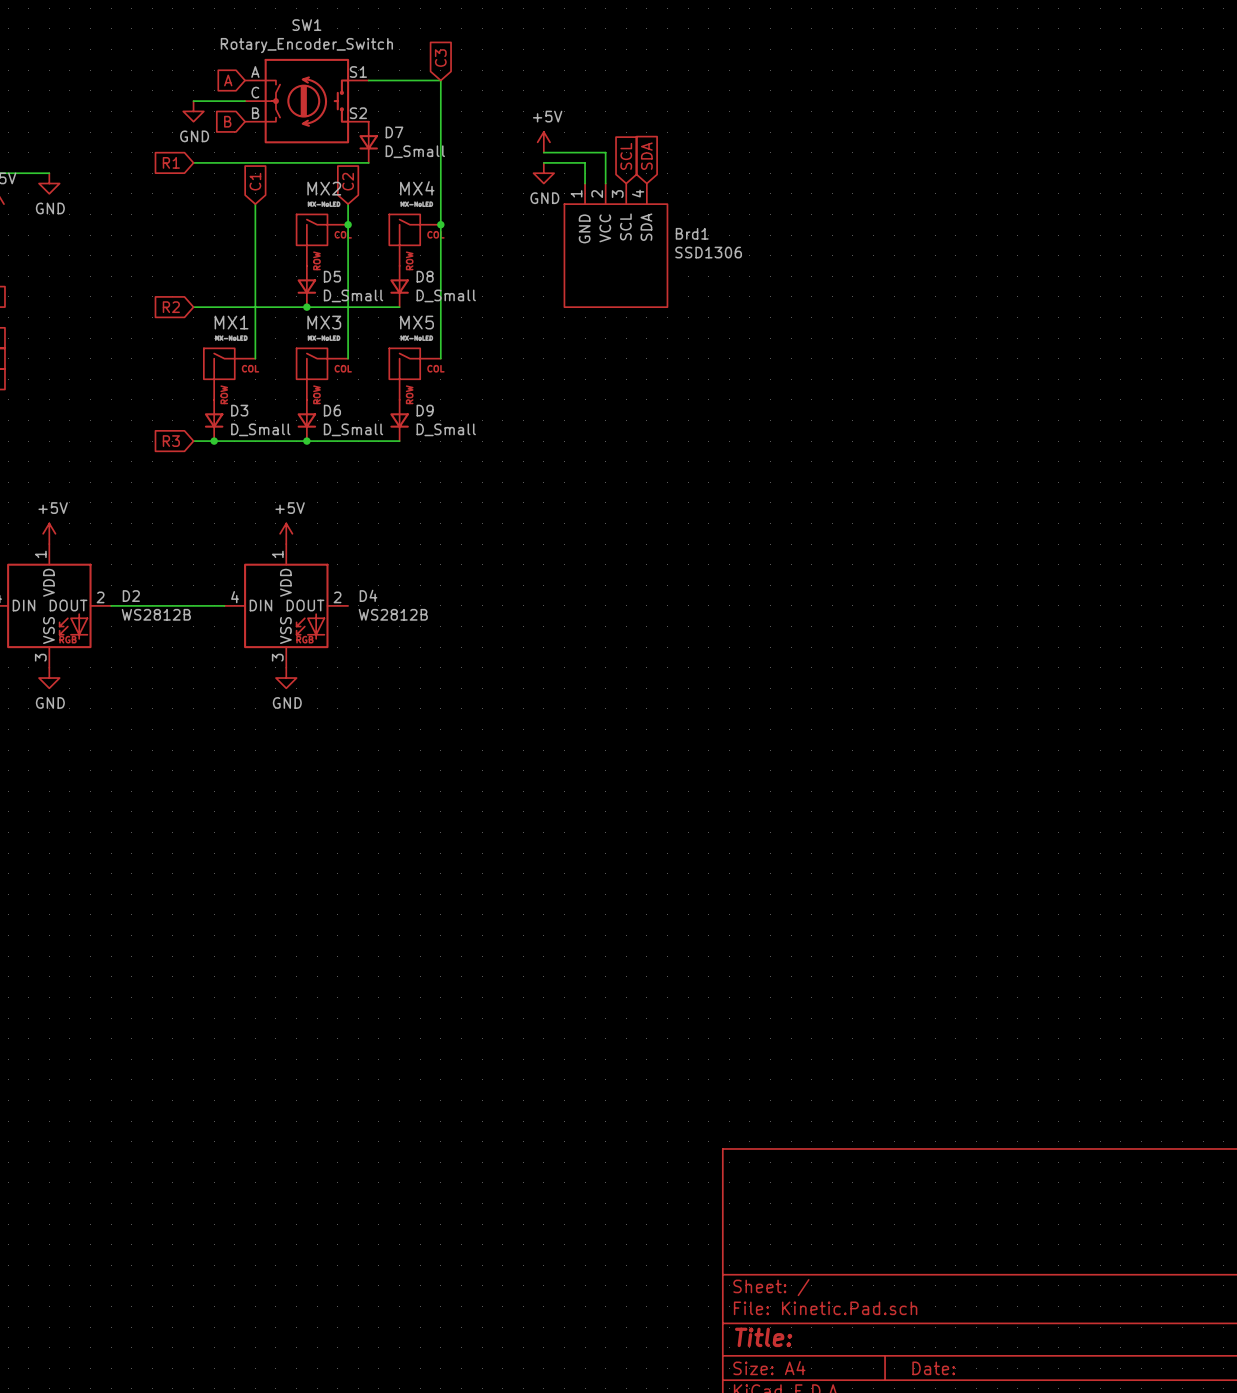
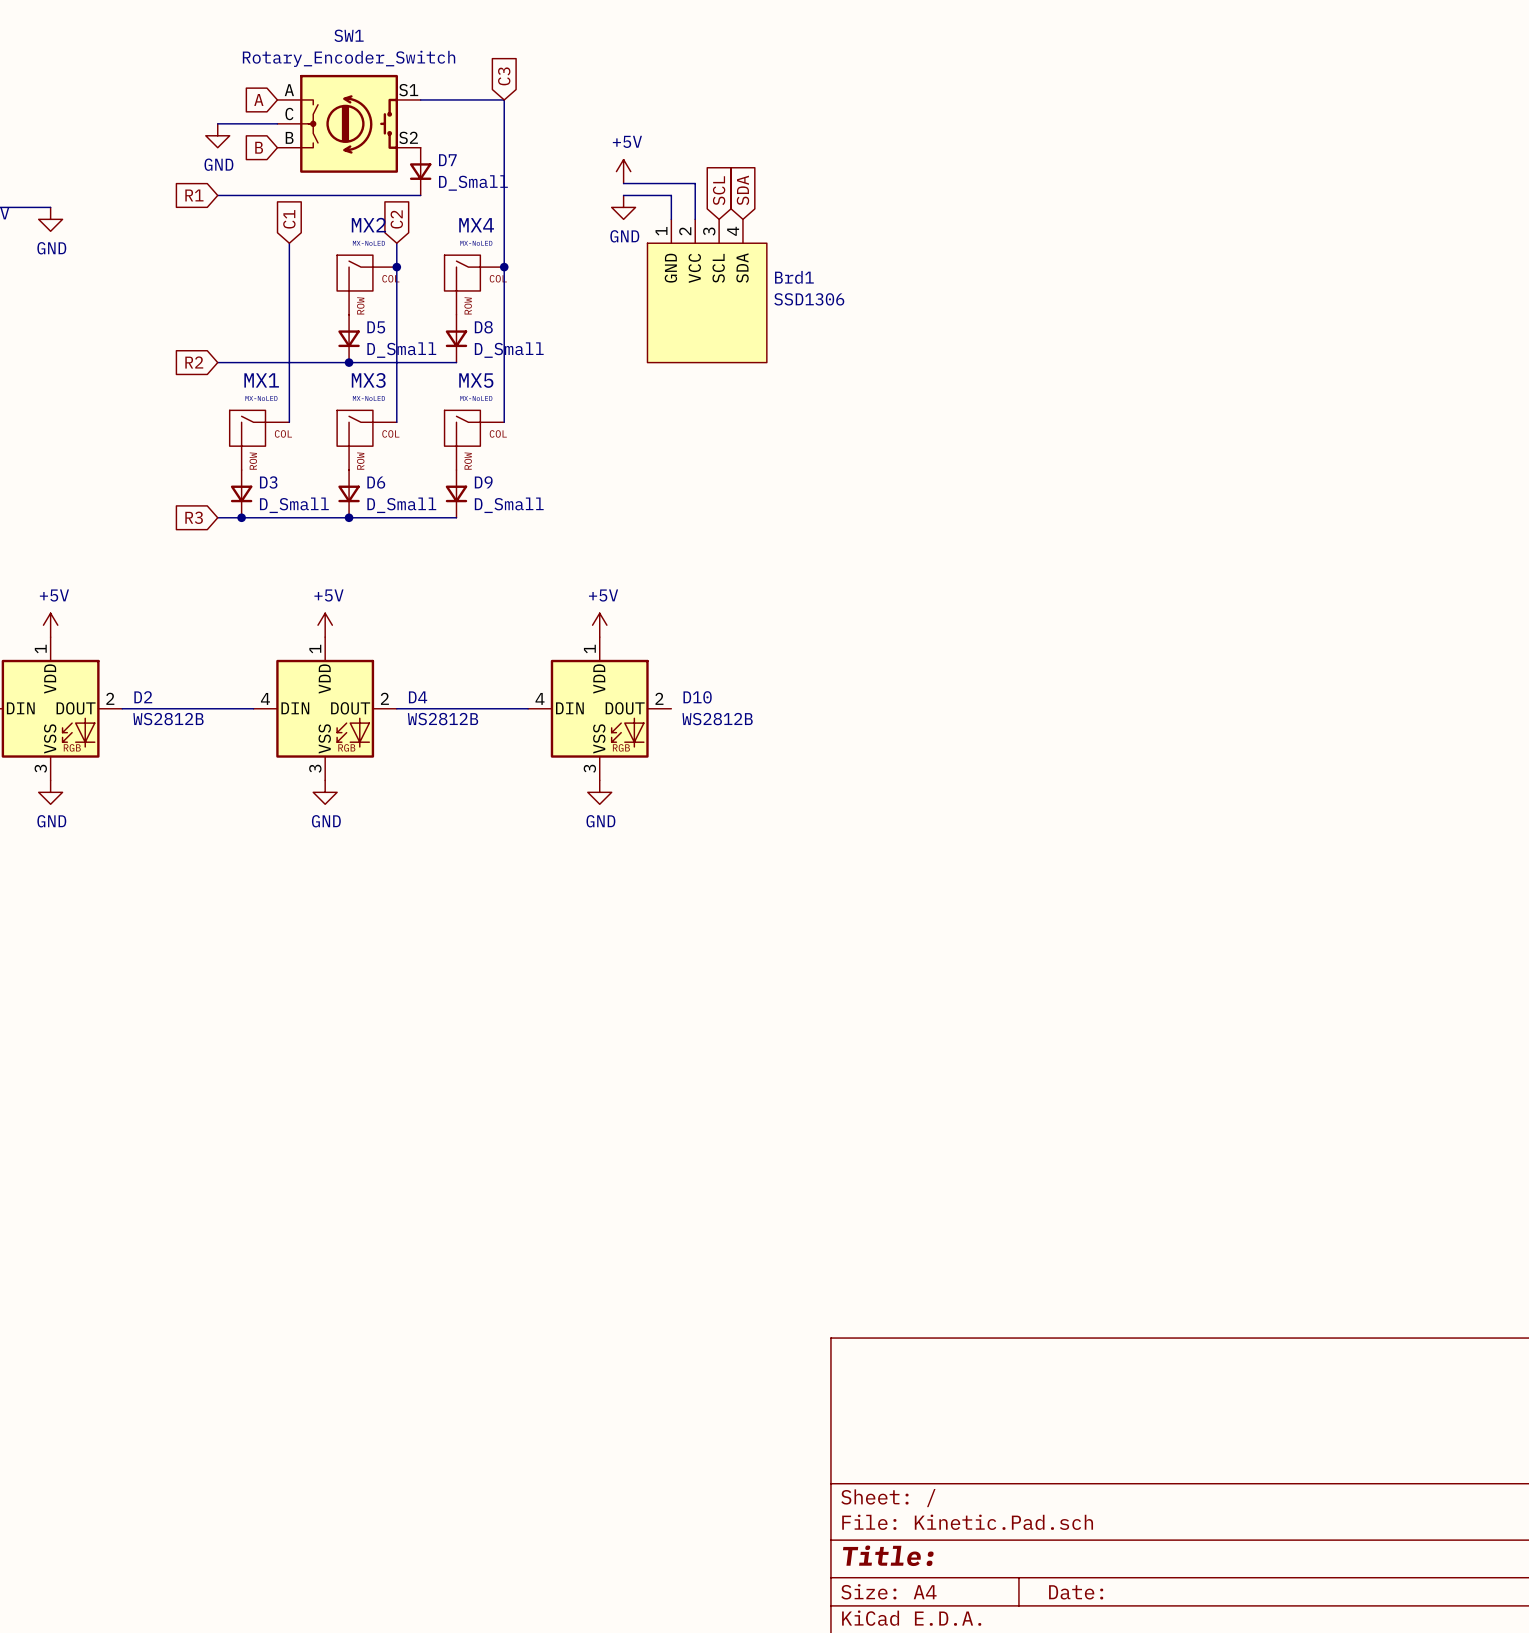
power symbol: none -> +5V (599, 625)
wire: none -> (396, 708) (528, 708)
D10: none -> WS2812B (599, 708)
power symbol: none -> GND (599, 792)

